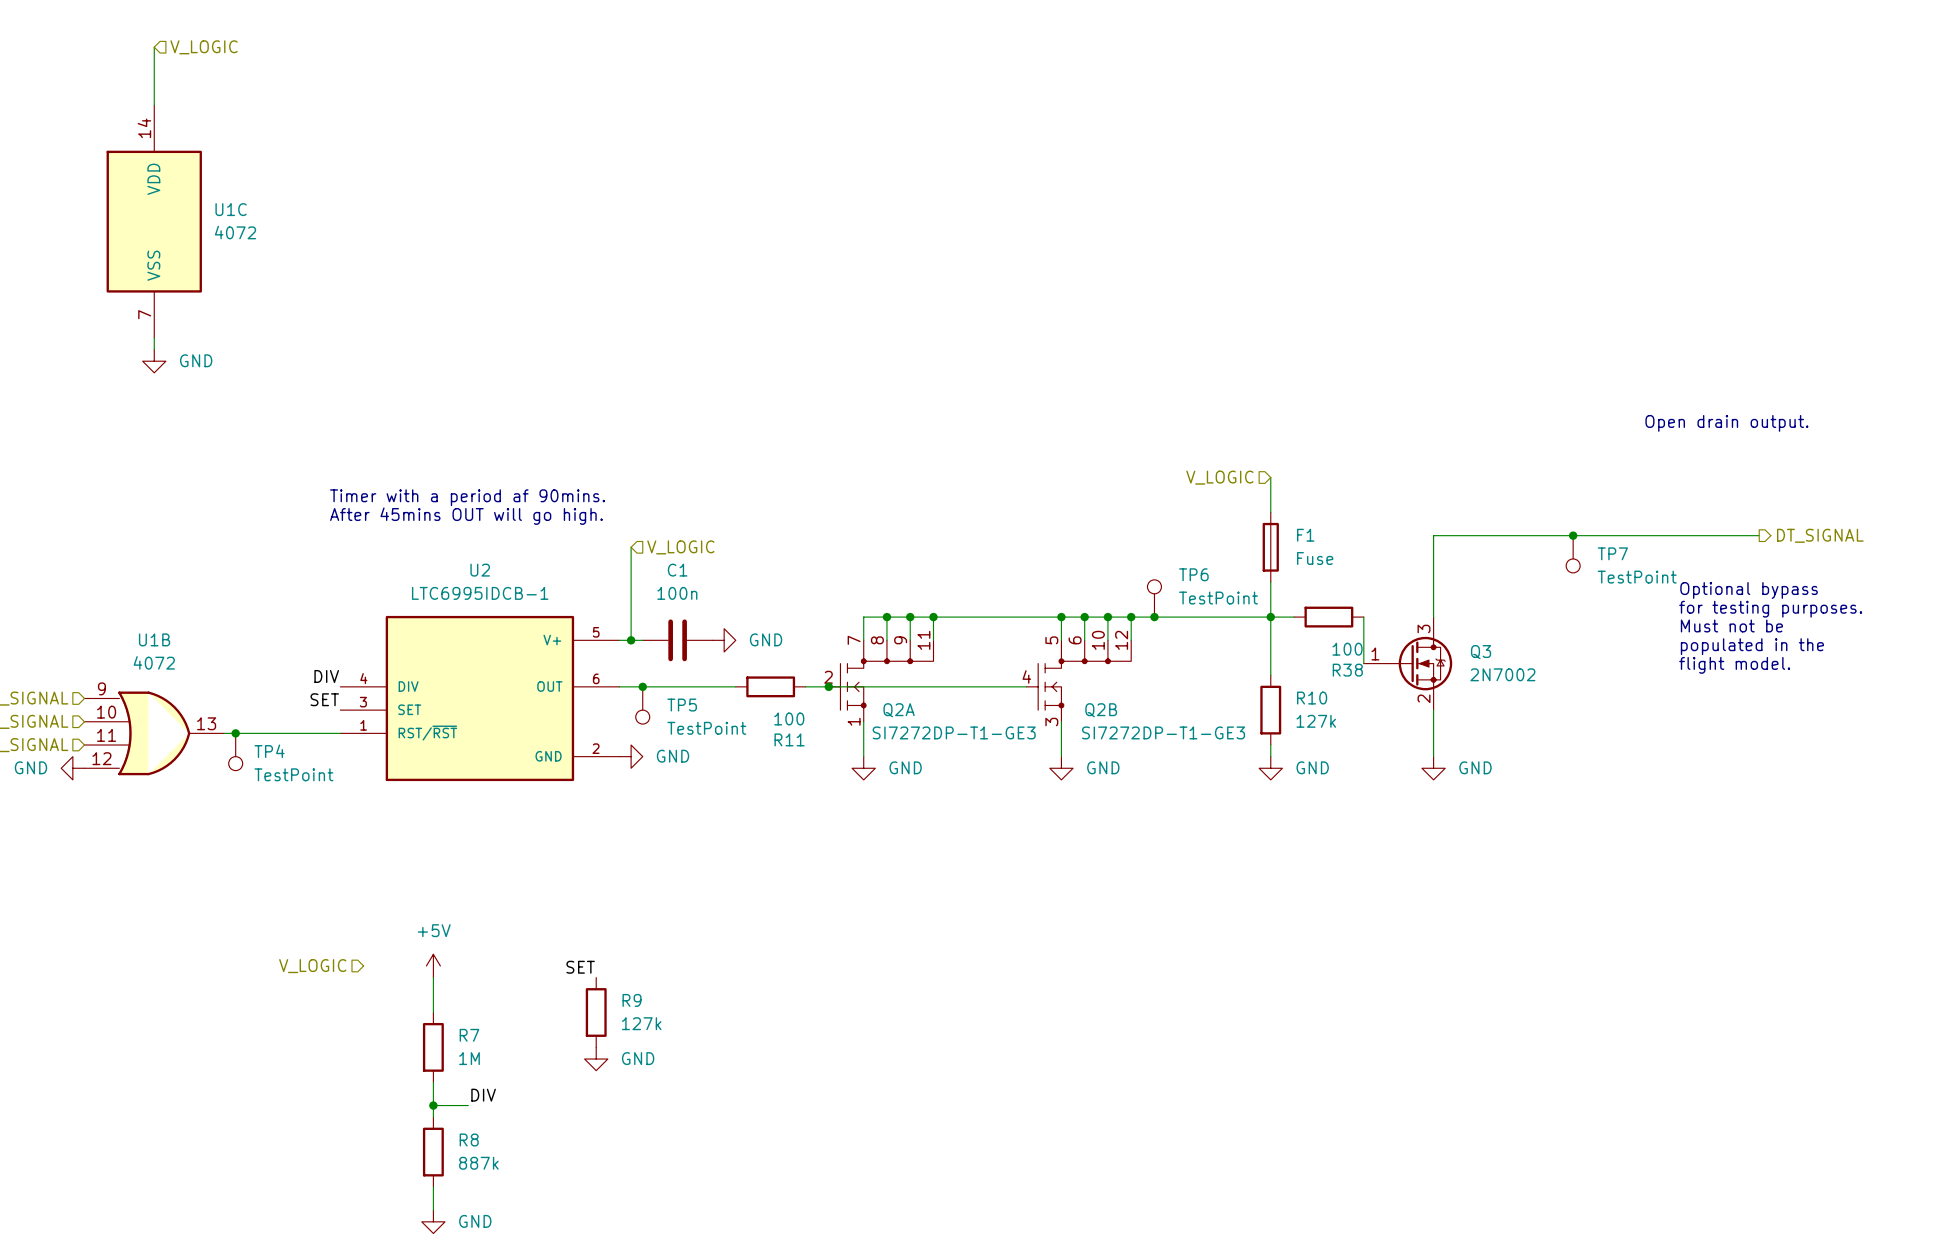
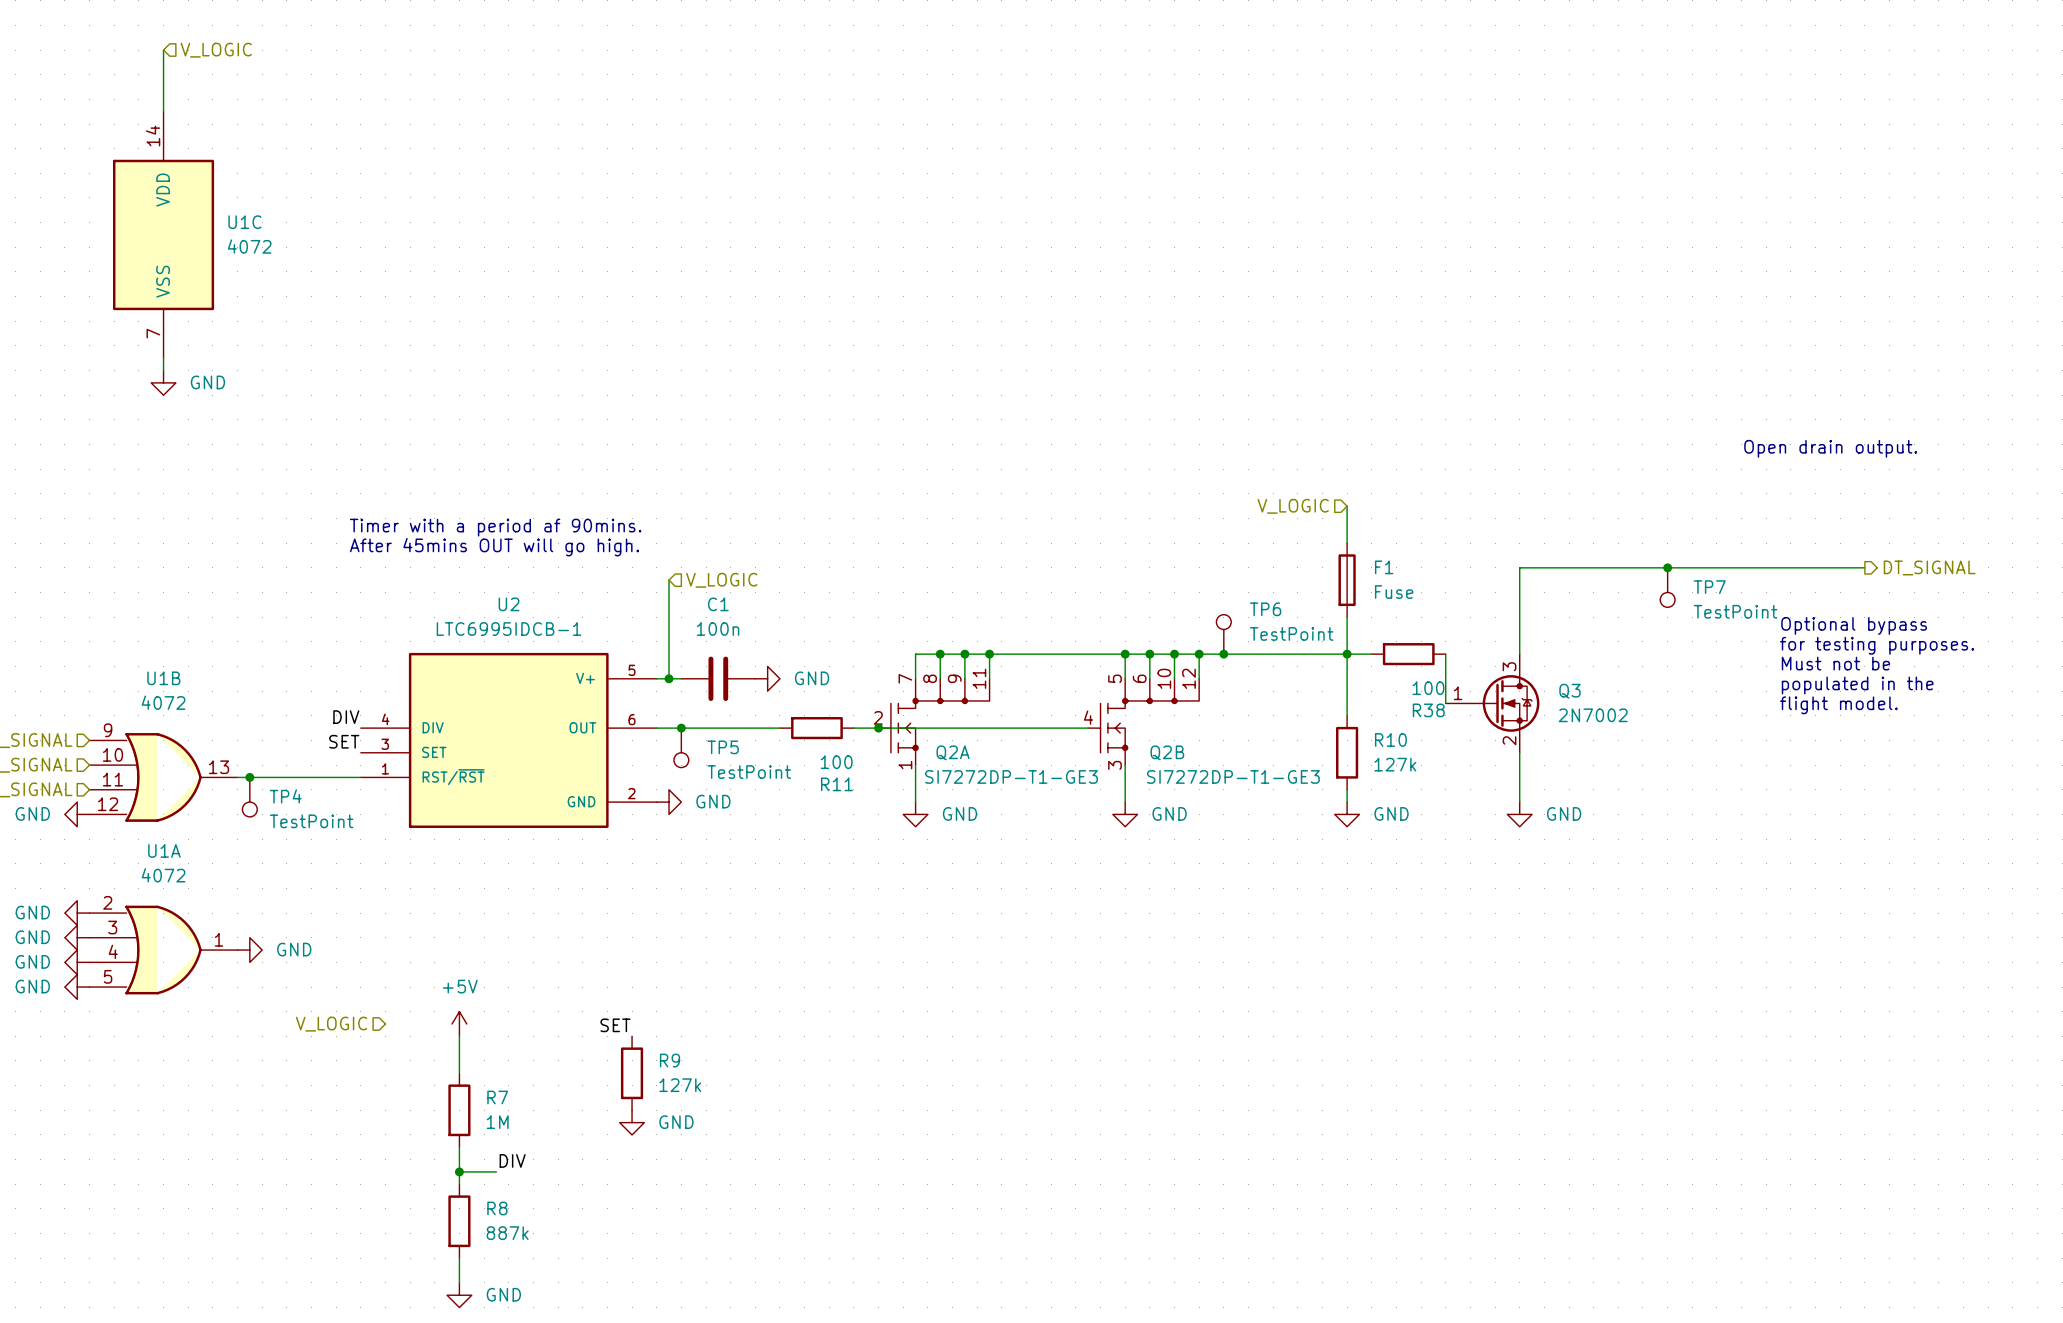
power symbol: none -> GND (77, 913)
power symbol: none -> GND (77, 937)
U1A: none -> 4072 (163, 950)
power symbol: none -> GND (249, 950)
power symbol: none -> GND (77, 962)
power symbol: none -> GND (77, 987)

